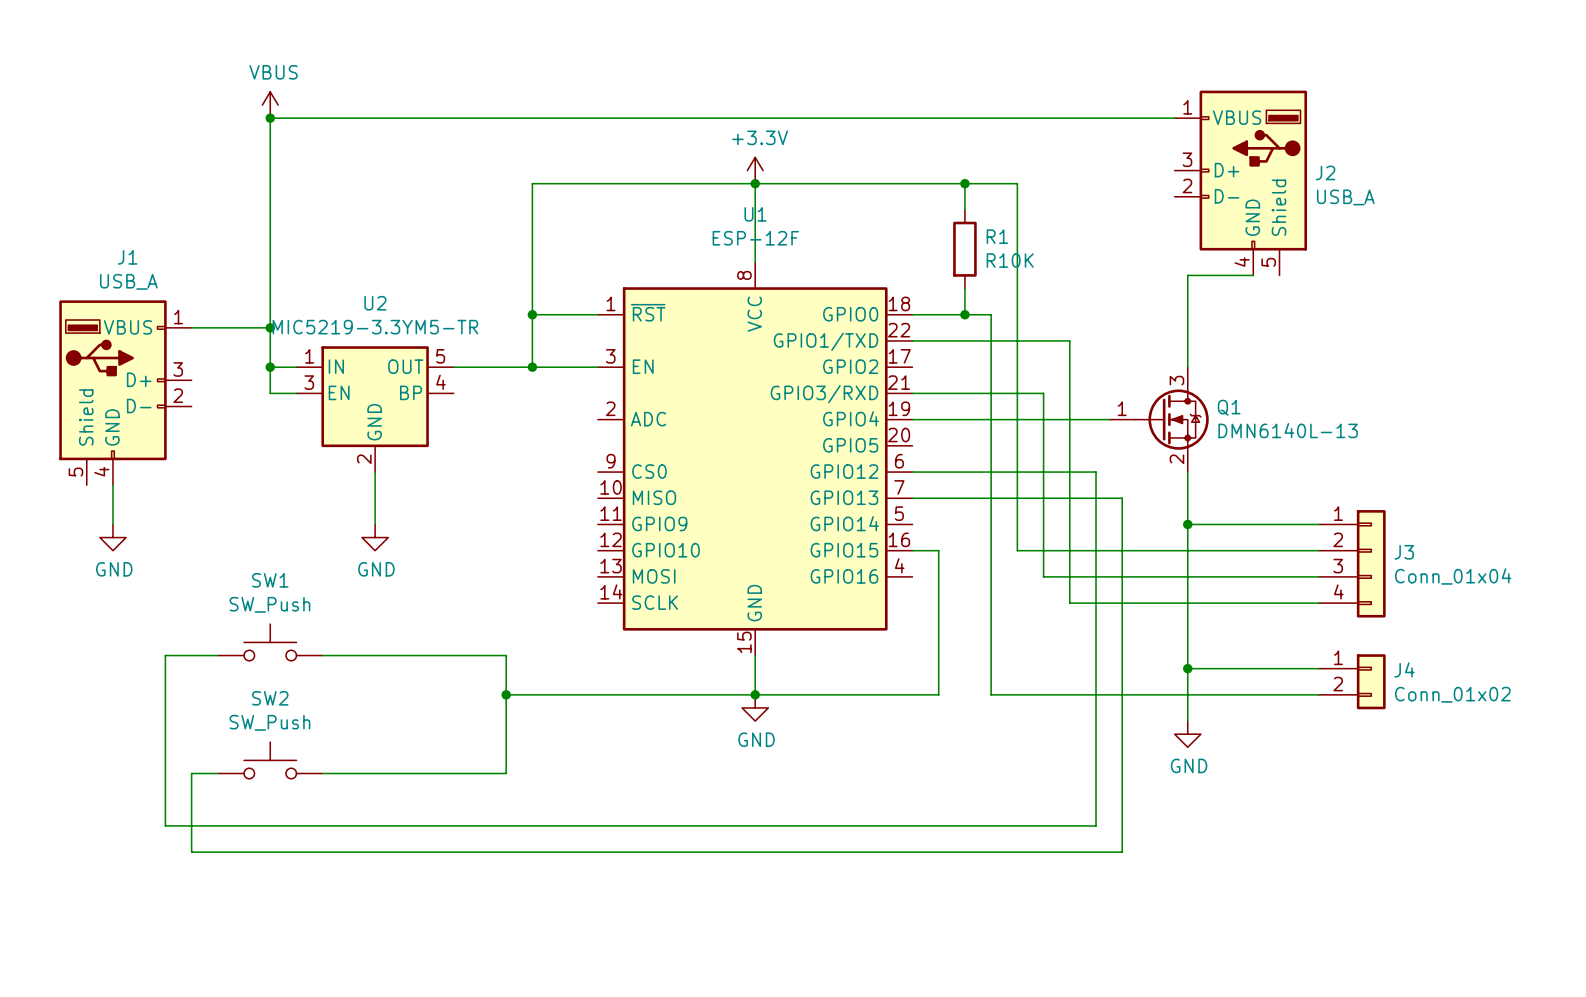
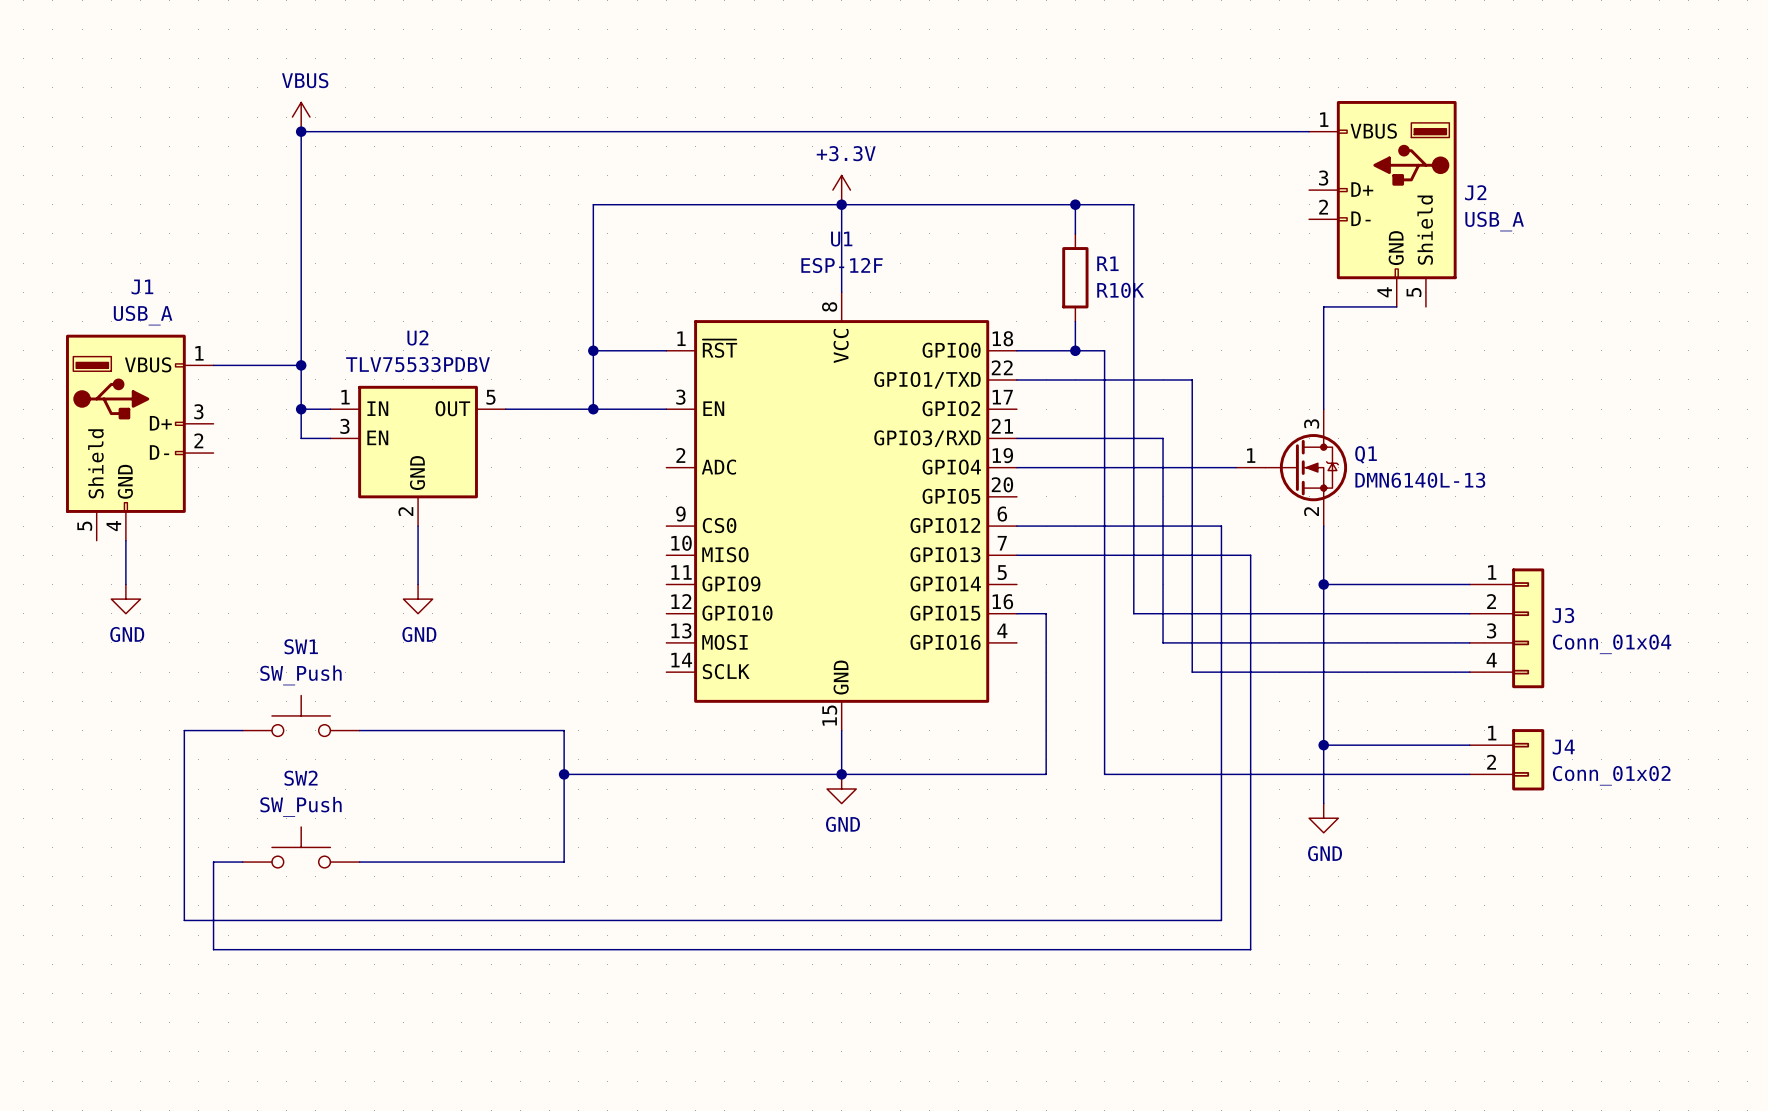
U2 value: MIC5219-3.3YM5-TR (375, 327) -> TLV75533PDBV (418, 364)
U2 symbol: [296, 346, 454, 473] -> [330, 385, 506, 527]

